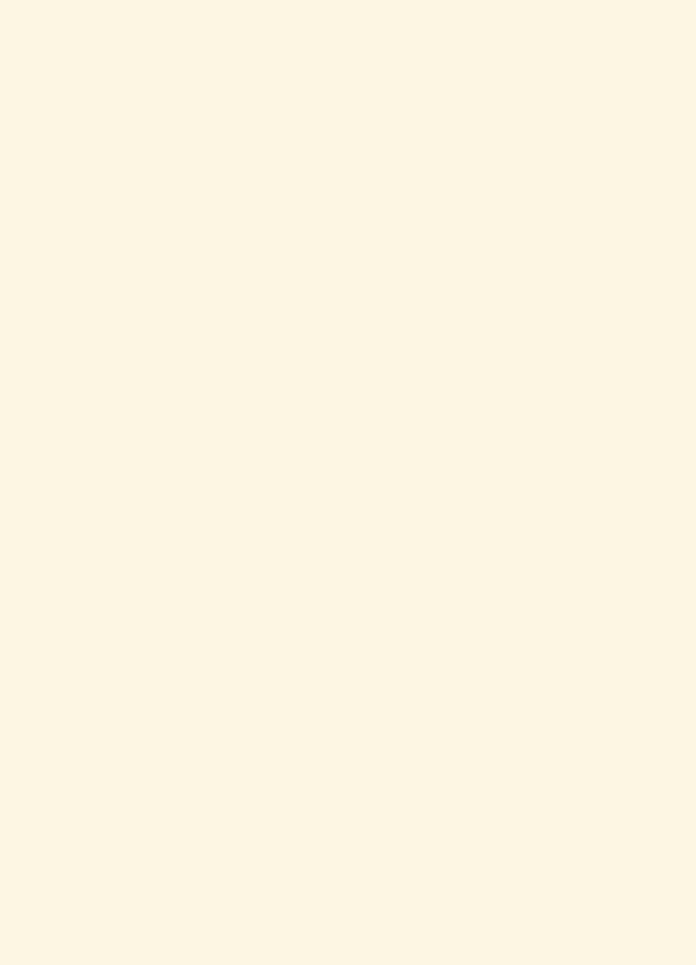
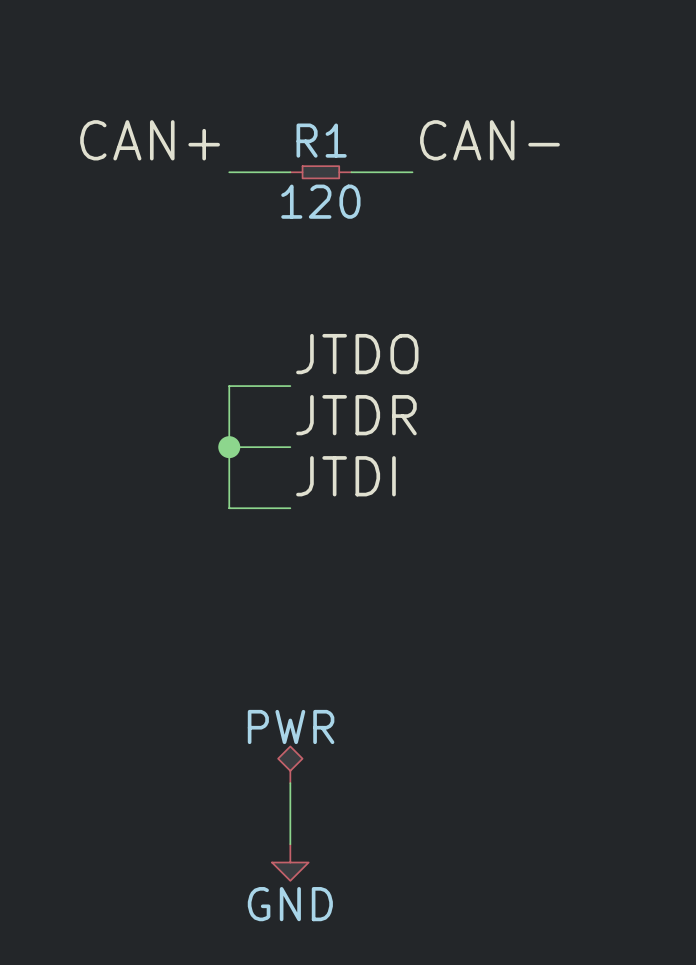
label: none -> CAN+ (150, 140)
label: none -> CAN- (489, 140)
wire: none -> (229, 172) (290, 172)
R1: none -> 120 (320, 172)
wire: none -> (351, 172) (412, 172)
label: none -> JTDO (357, 354)
wire: none -> (290, 386) (229, 386) (229, 508) (290, 508)
label: none -> JTDR (356, 415)
wire: none -> (229, 447) (290, 447)
junction: none -> (229, 447)
label: none -> JTDI (345, 476)
power symbol: none -> PWR (290, 764)
wire: none -> (290, 783) (290, 844)
power symbol: none -> GND (290, 862)

